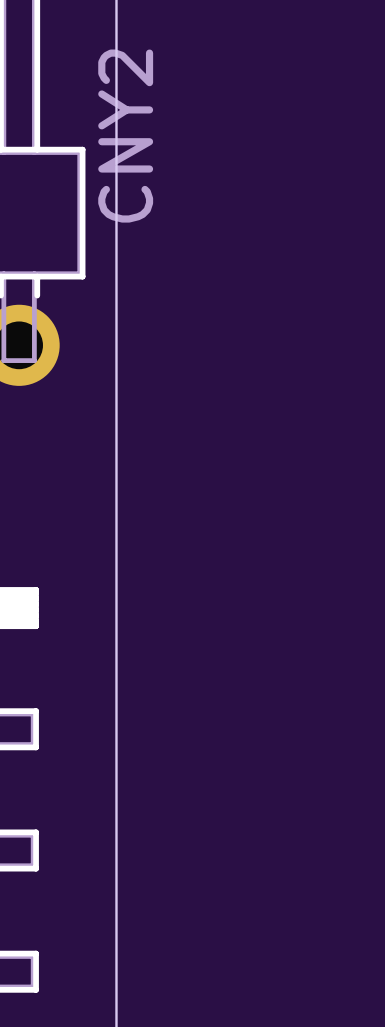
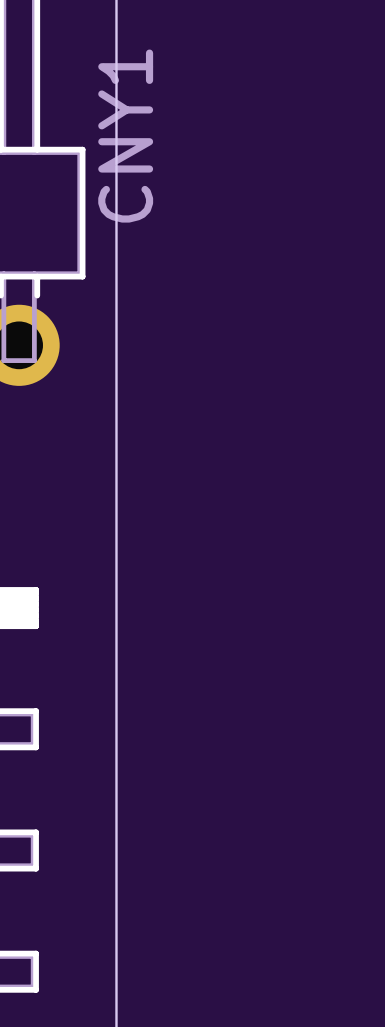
part value: CNY2 (125, 136) -> CNY1 (125, 136)

